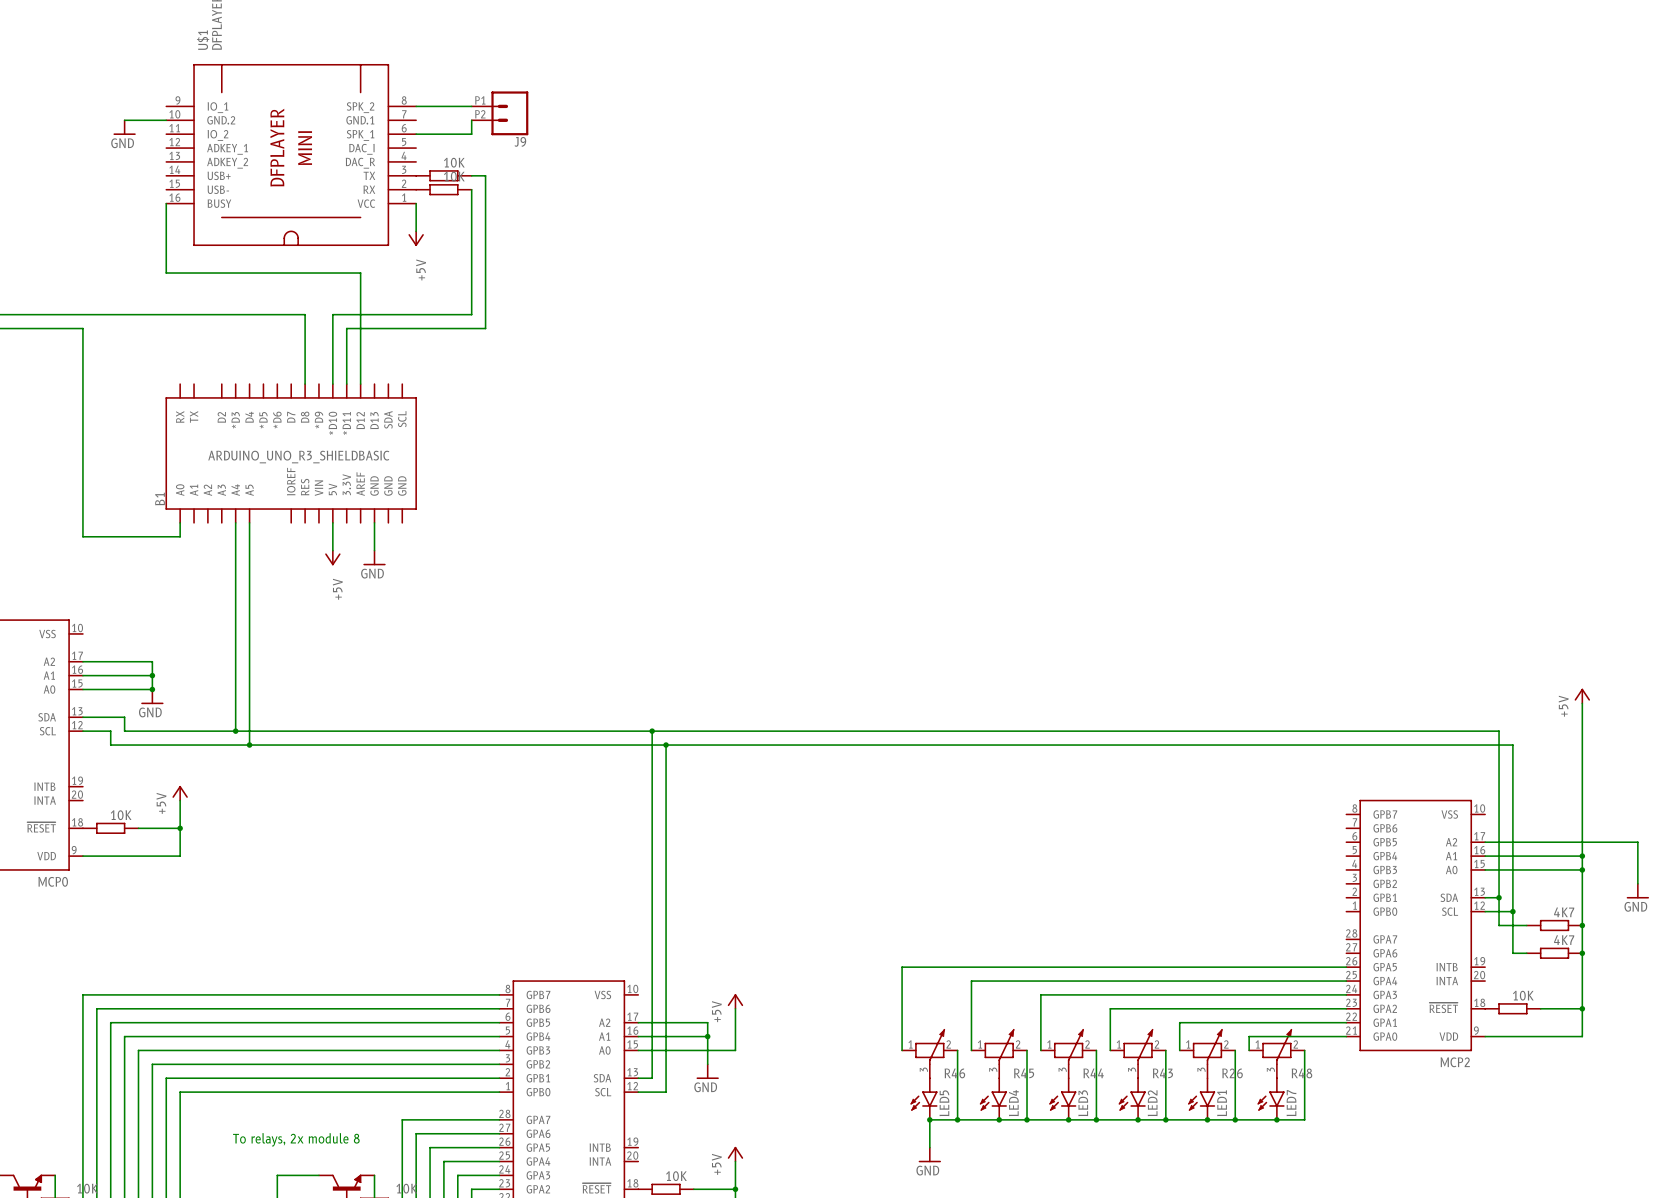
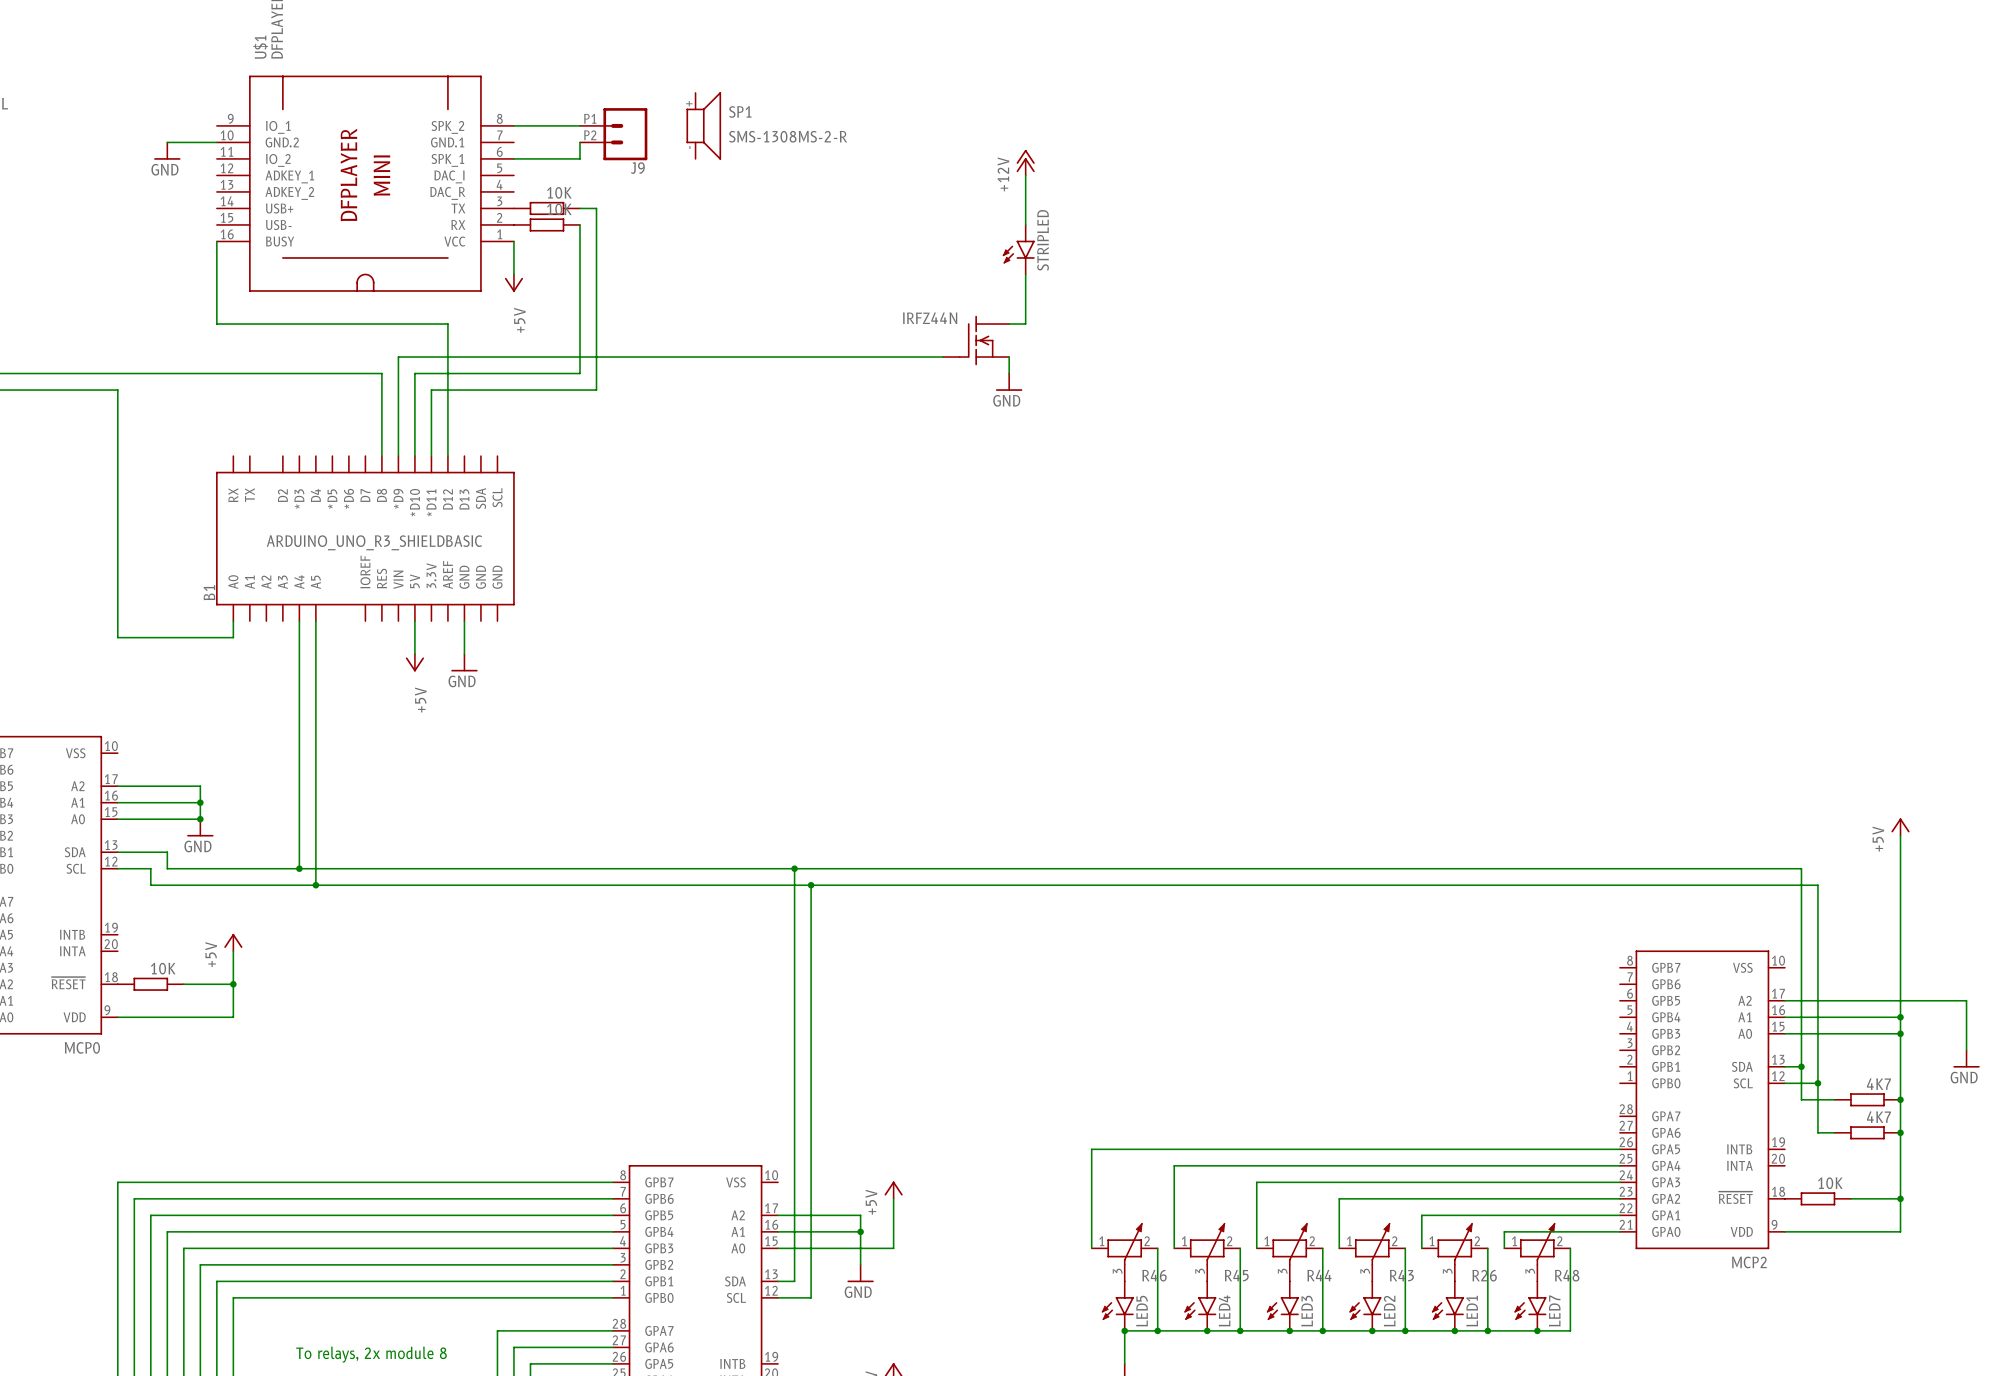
SP1: none -> SMS-1308MS-2-R (703, 125)
power symbol: none -> +12V (1025, 162)
wire: none -> (1025, 175) (1025, 224)
STRIPLED: none -> (1018, 249)
wire: none -> (1025, 274) (1025, 324) (1009, 324)
IRFZ44N: none -> (976, 340)
wire: none -> (943, 357) (398, 357) (398, 456)
wire: none -> (1009, 357) (1009, 373)
power symbol: none -> GND (1009, 382)

